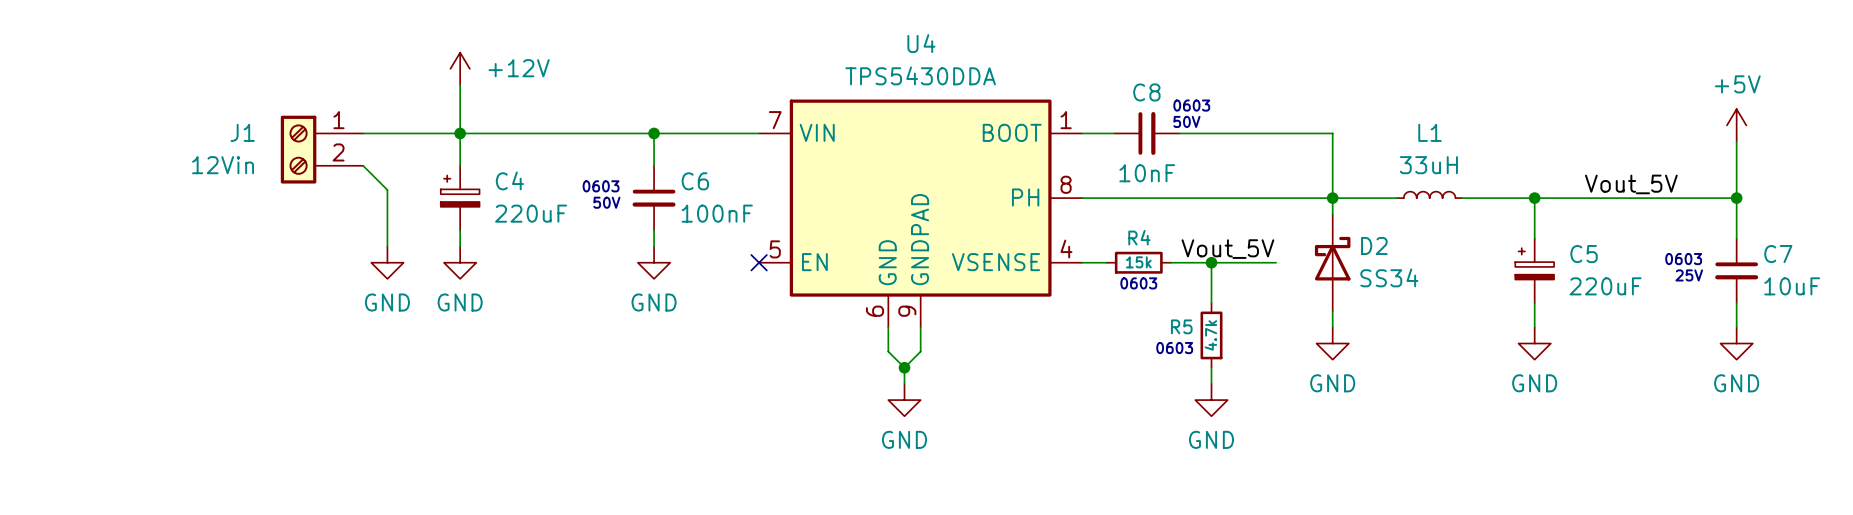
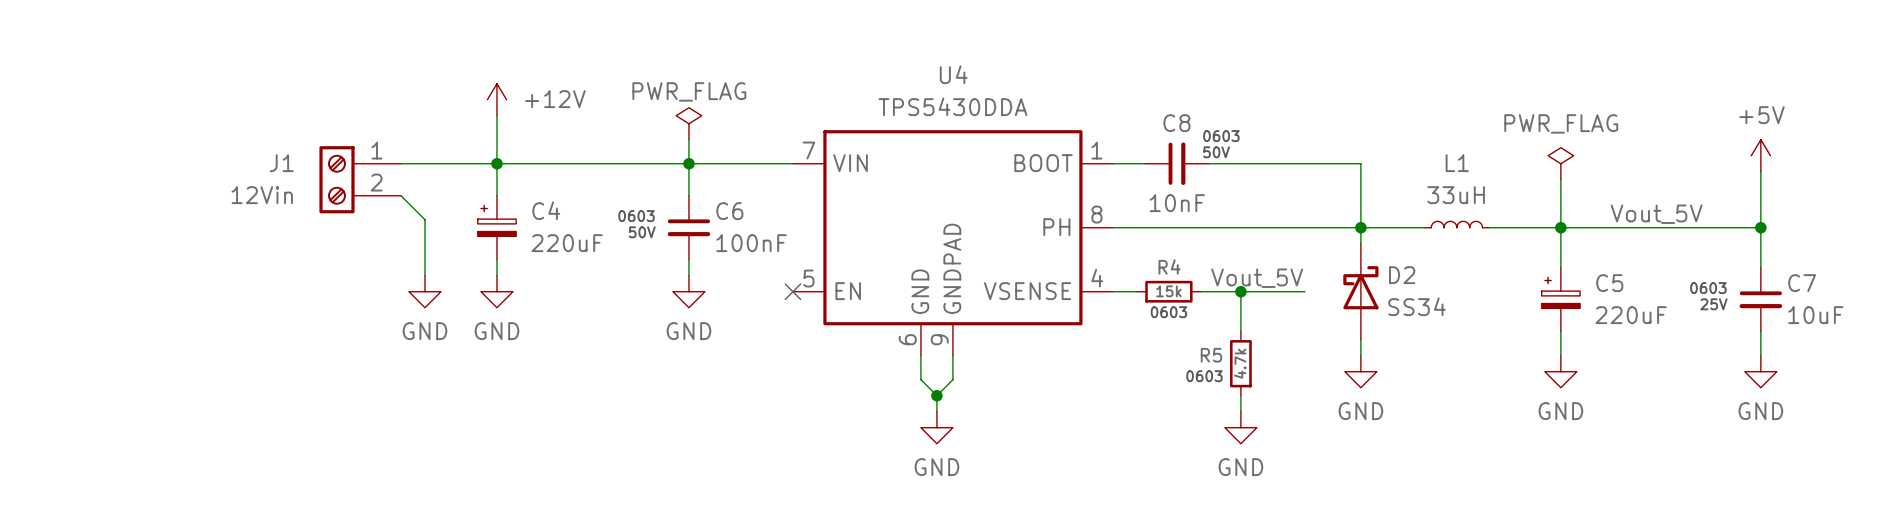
power symbol: none -> PWR_FLAG (688, 123)
wire: none -> (688, 139) (688, 163)
power symbol: none -> PWR_FLAG (1560, 163)
wire: none -> (1560, 179) (1560, 227)

